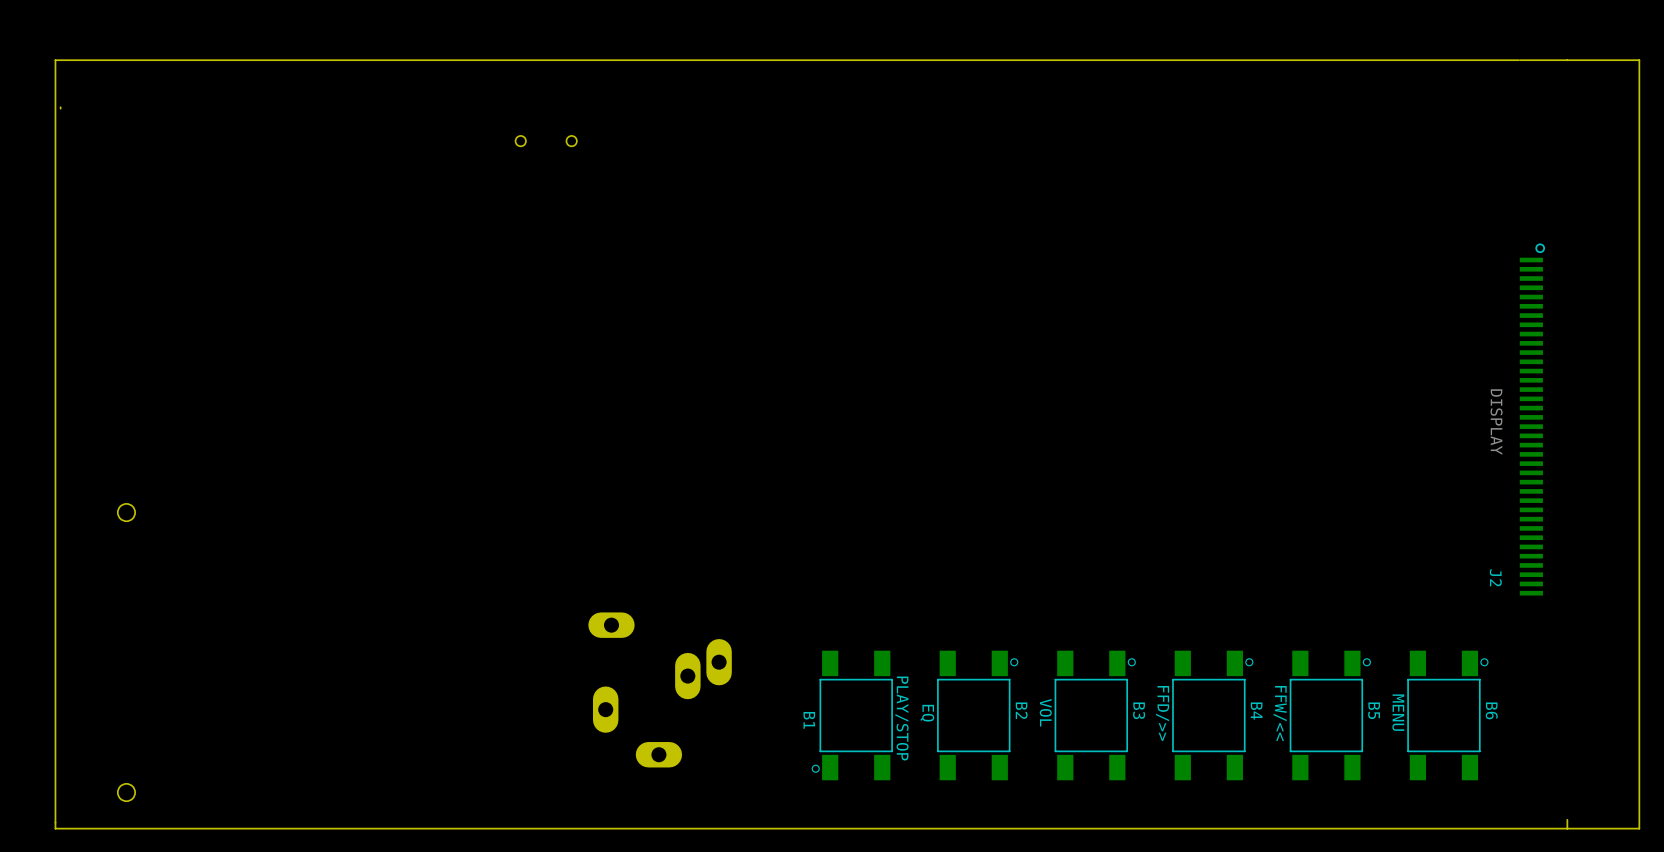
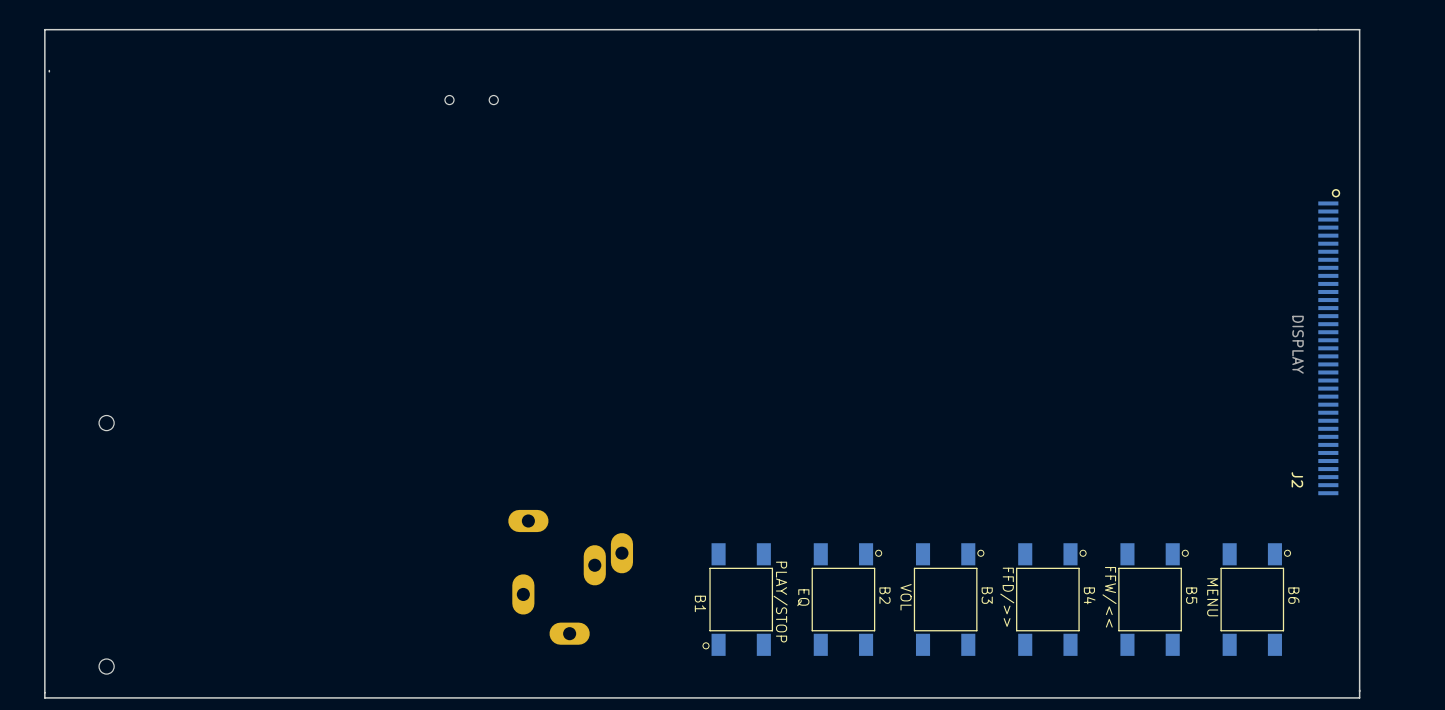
board edge: (1567, 60) (1639, 60) (1639, 828) (1567, 828) -> (1359, 29) (1359, 690)

